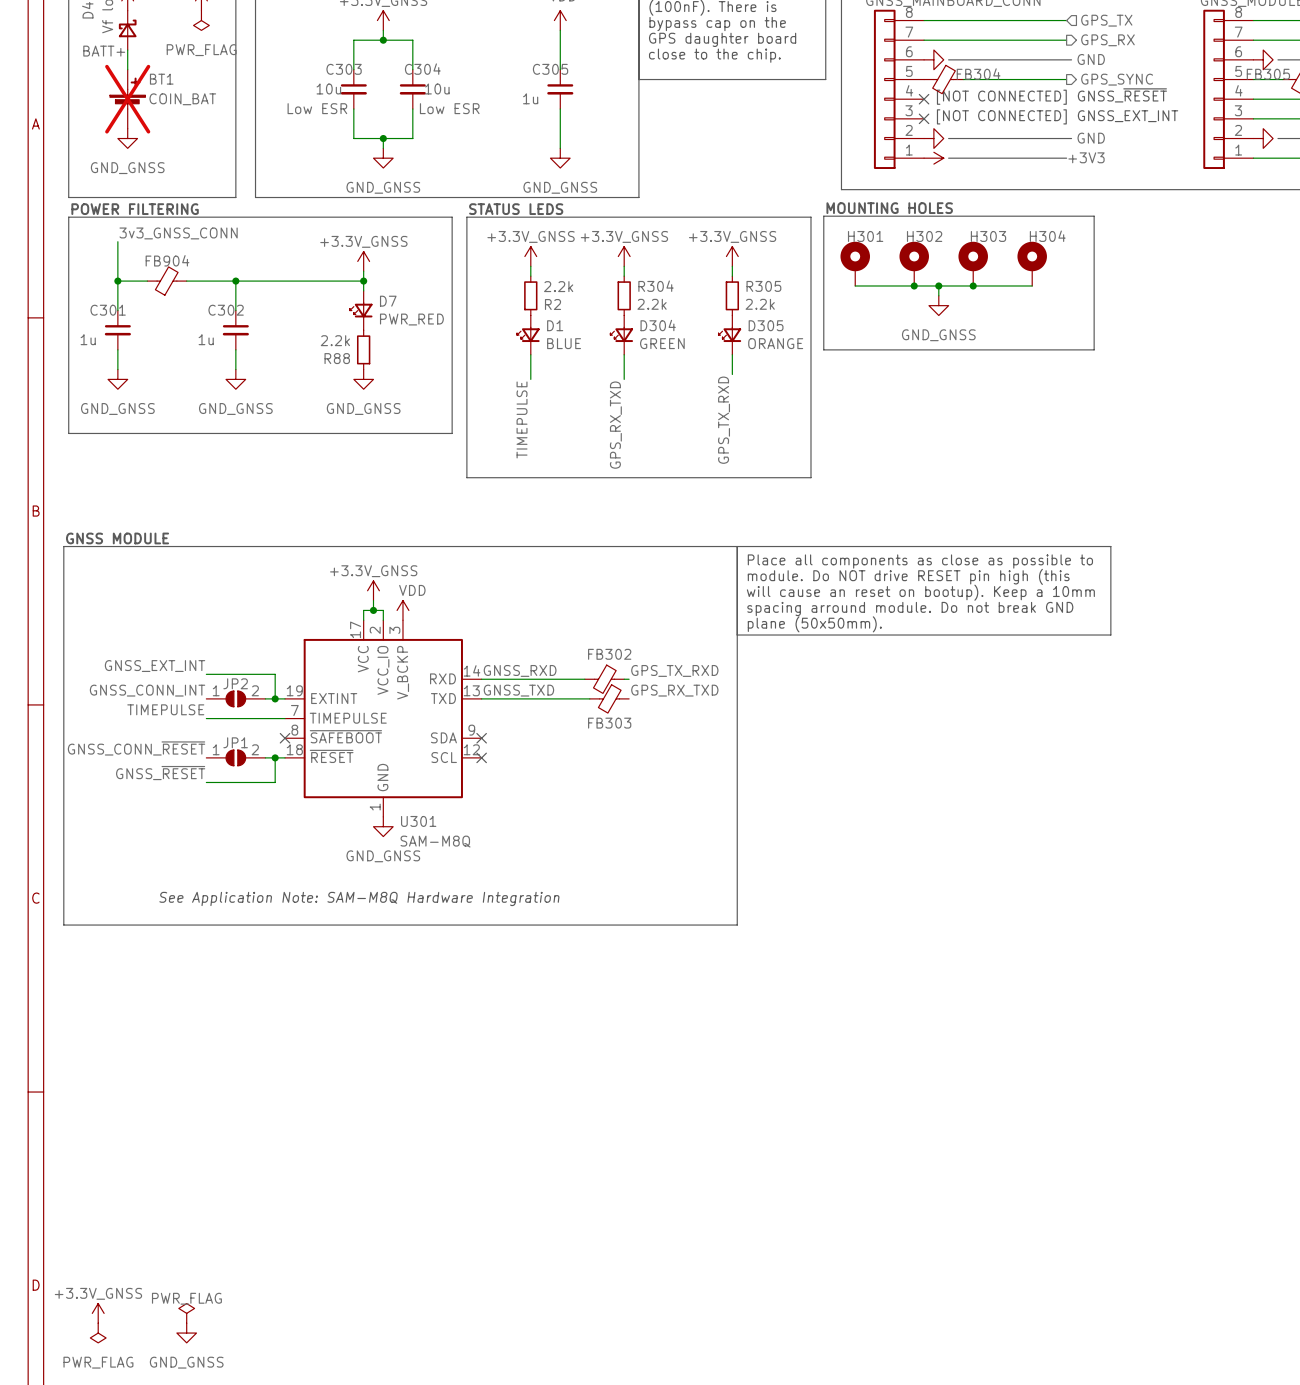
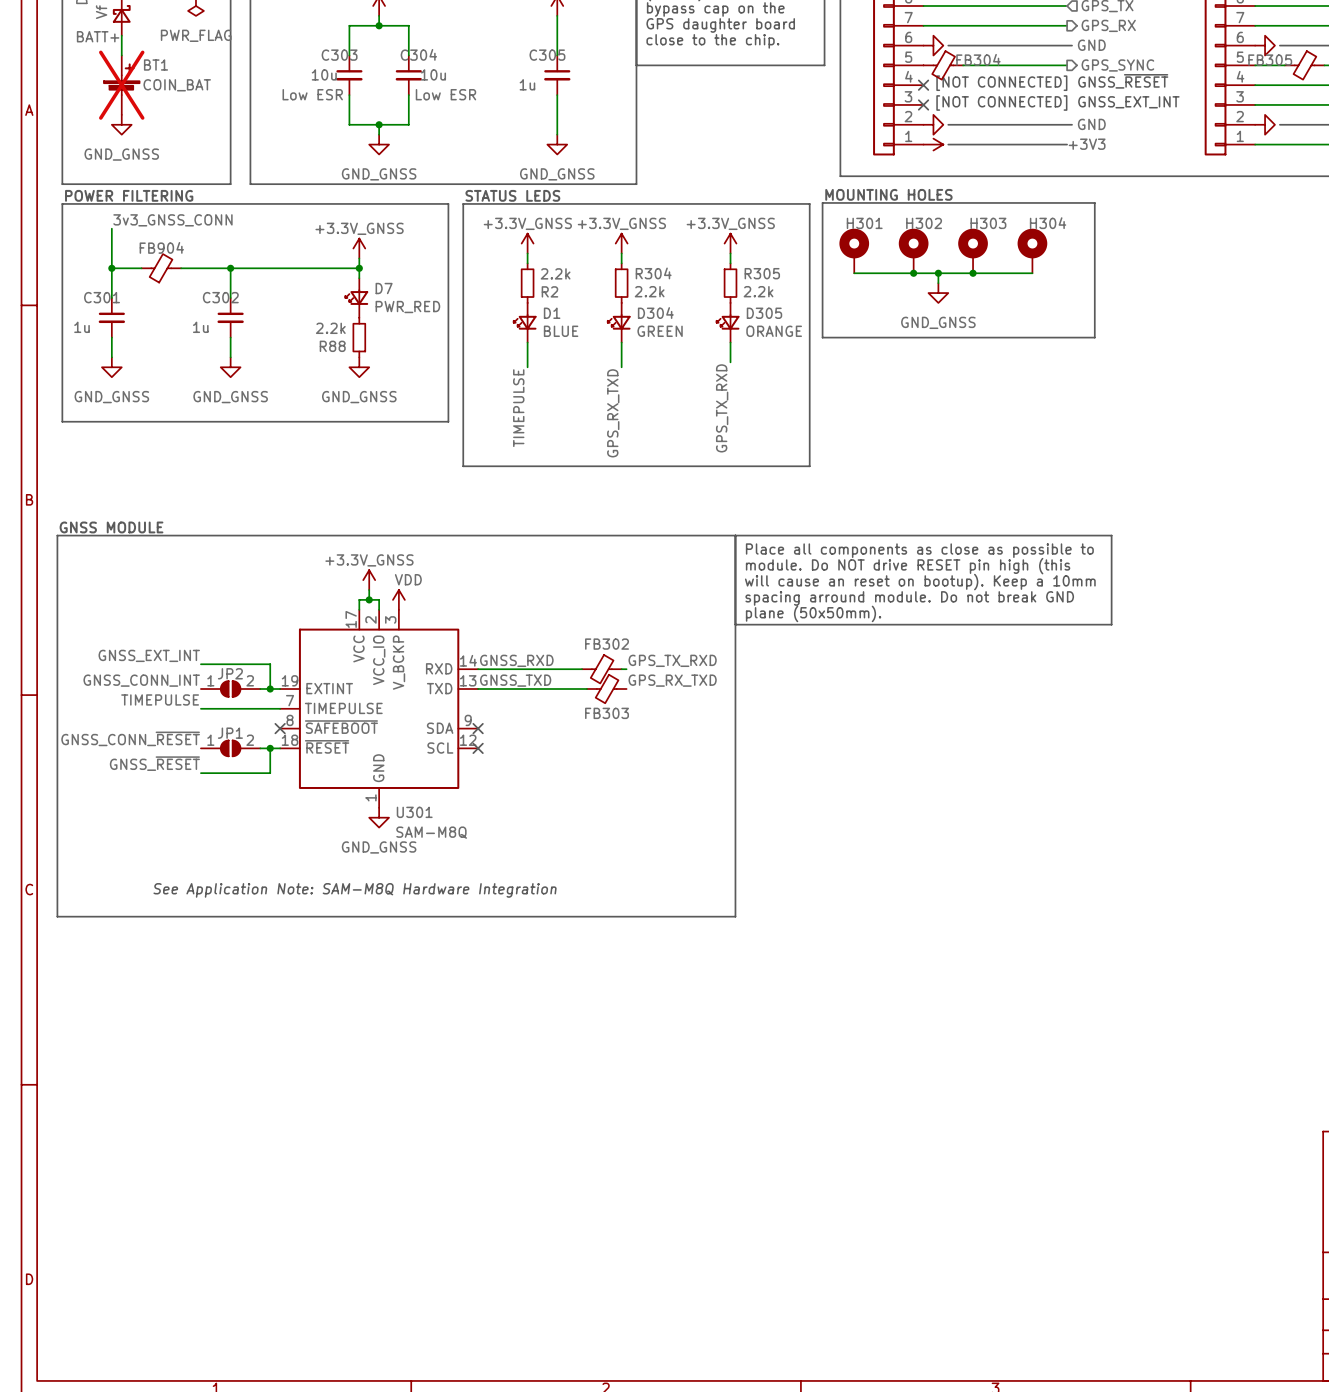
power symbol: +3.3V_GNSS (98, 1313) -> none
power symbol: PWR_FLAG (186, 1313) -> none
power symbol: PWR_FLAG (98, 1333) -> none
power symbol: GND_GNSS (186, 1333) -> none

